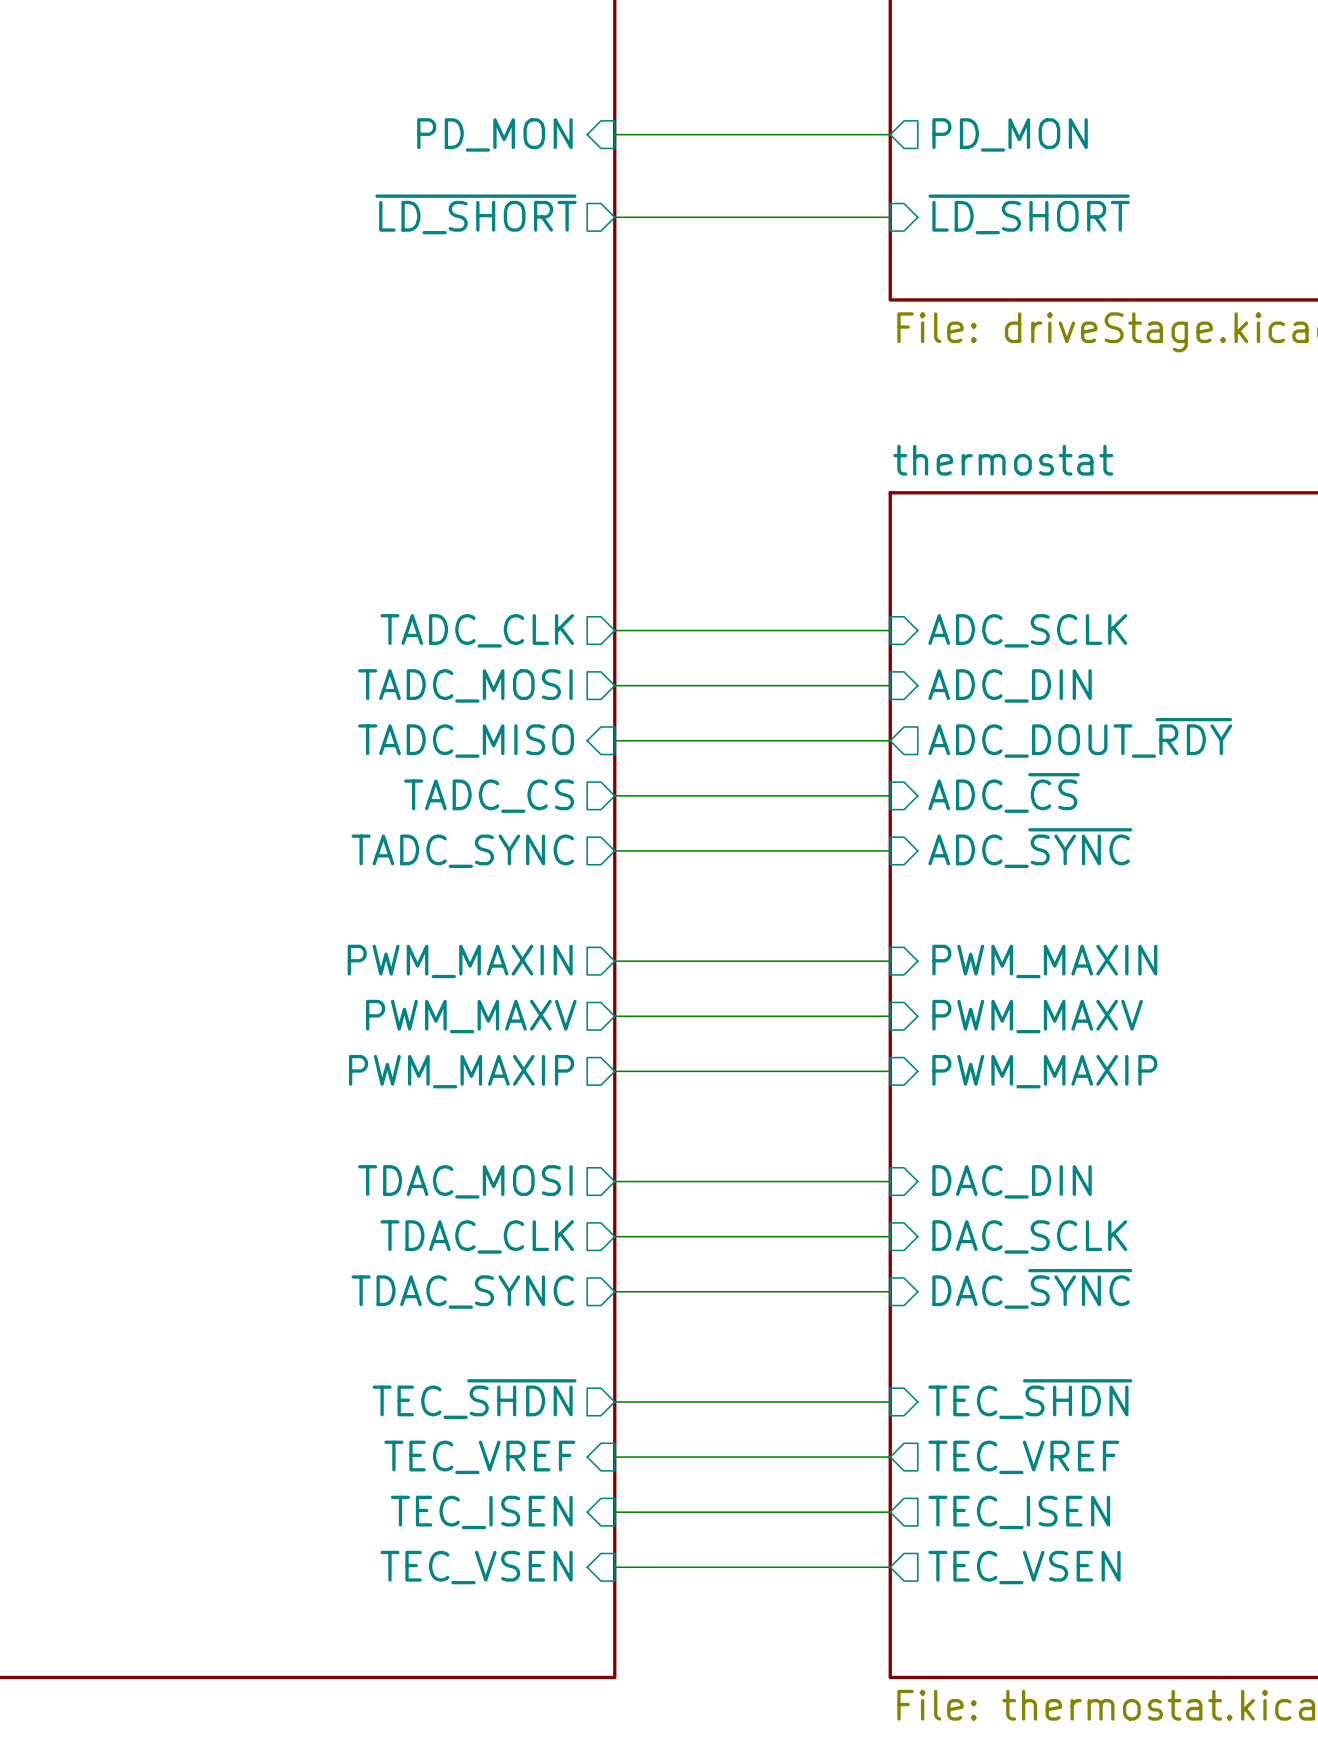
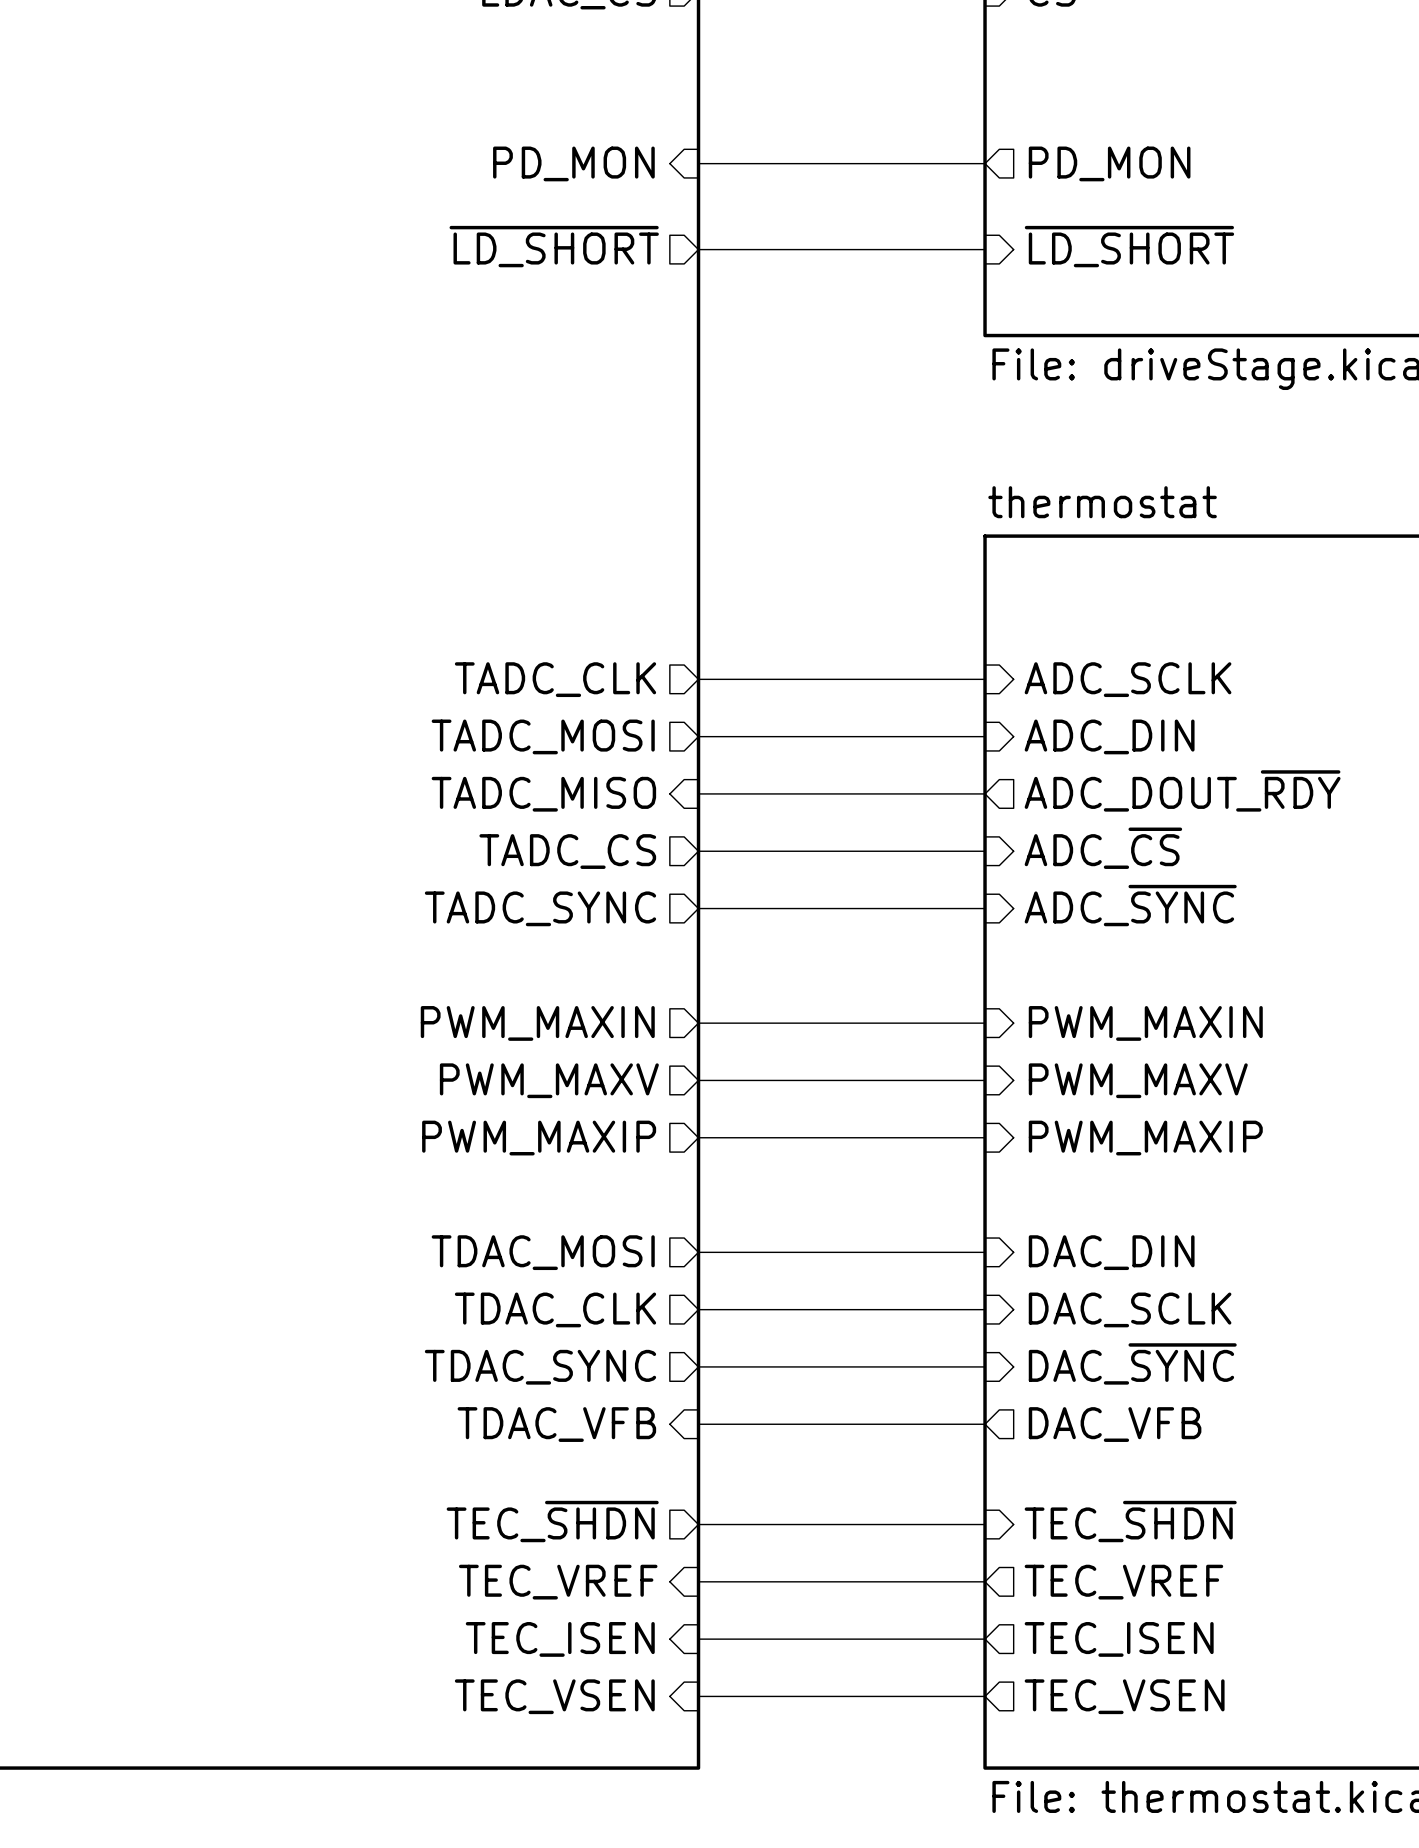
wire: none -> (698, 1424) (985, 1424)
sheet pin: none -> TDAC_VFB (556, 1424)
sheet pin: none -> DAC_VFB (1115, 1424)
sheet pin position: TEC_~{SHDN} (474, 1399) -> TEC_~{SHDN} (552, 1521)
sheet pin position: TEC_~{SHDN} (1030, 1399) -> TEC_~{SHDN} (1130, 1521)
wire: (614, 1401) (890, 1401) -> (698, 1524) (985, 1524)
sheet pin position: TEC_VREF (479, 1457) -> TEC_VREF (558, 1582)
wire: (614, 1457) (890, 1457) -> (698, 1581) (985, 1581)
sheet pin position: TEC_VREF (1023, 1457) -> TEC_VREF (1123, 1582)
sheet pin position: TEC_ISEN (481, 1512) -> TEC_ISEN (560, 1639)
wire: (614, 1512) (890, 1512) -> (698, 1639) (985, 1639)
sheet pin position: TEC_ISEN (1019, 1512) -> TEC_ISEN (1119, 1639)
sheet pin position: TEC_VSEN (476, 1567) -> TEC_VSEN (554, 1696)
wire: (614, 1567) (890, 1567) -> (698, 1696) (985, 1696)
sheet pin position: TEC_VSEN (1024, 1567) -> TEC_VSEN (1124, 1696)

